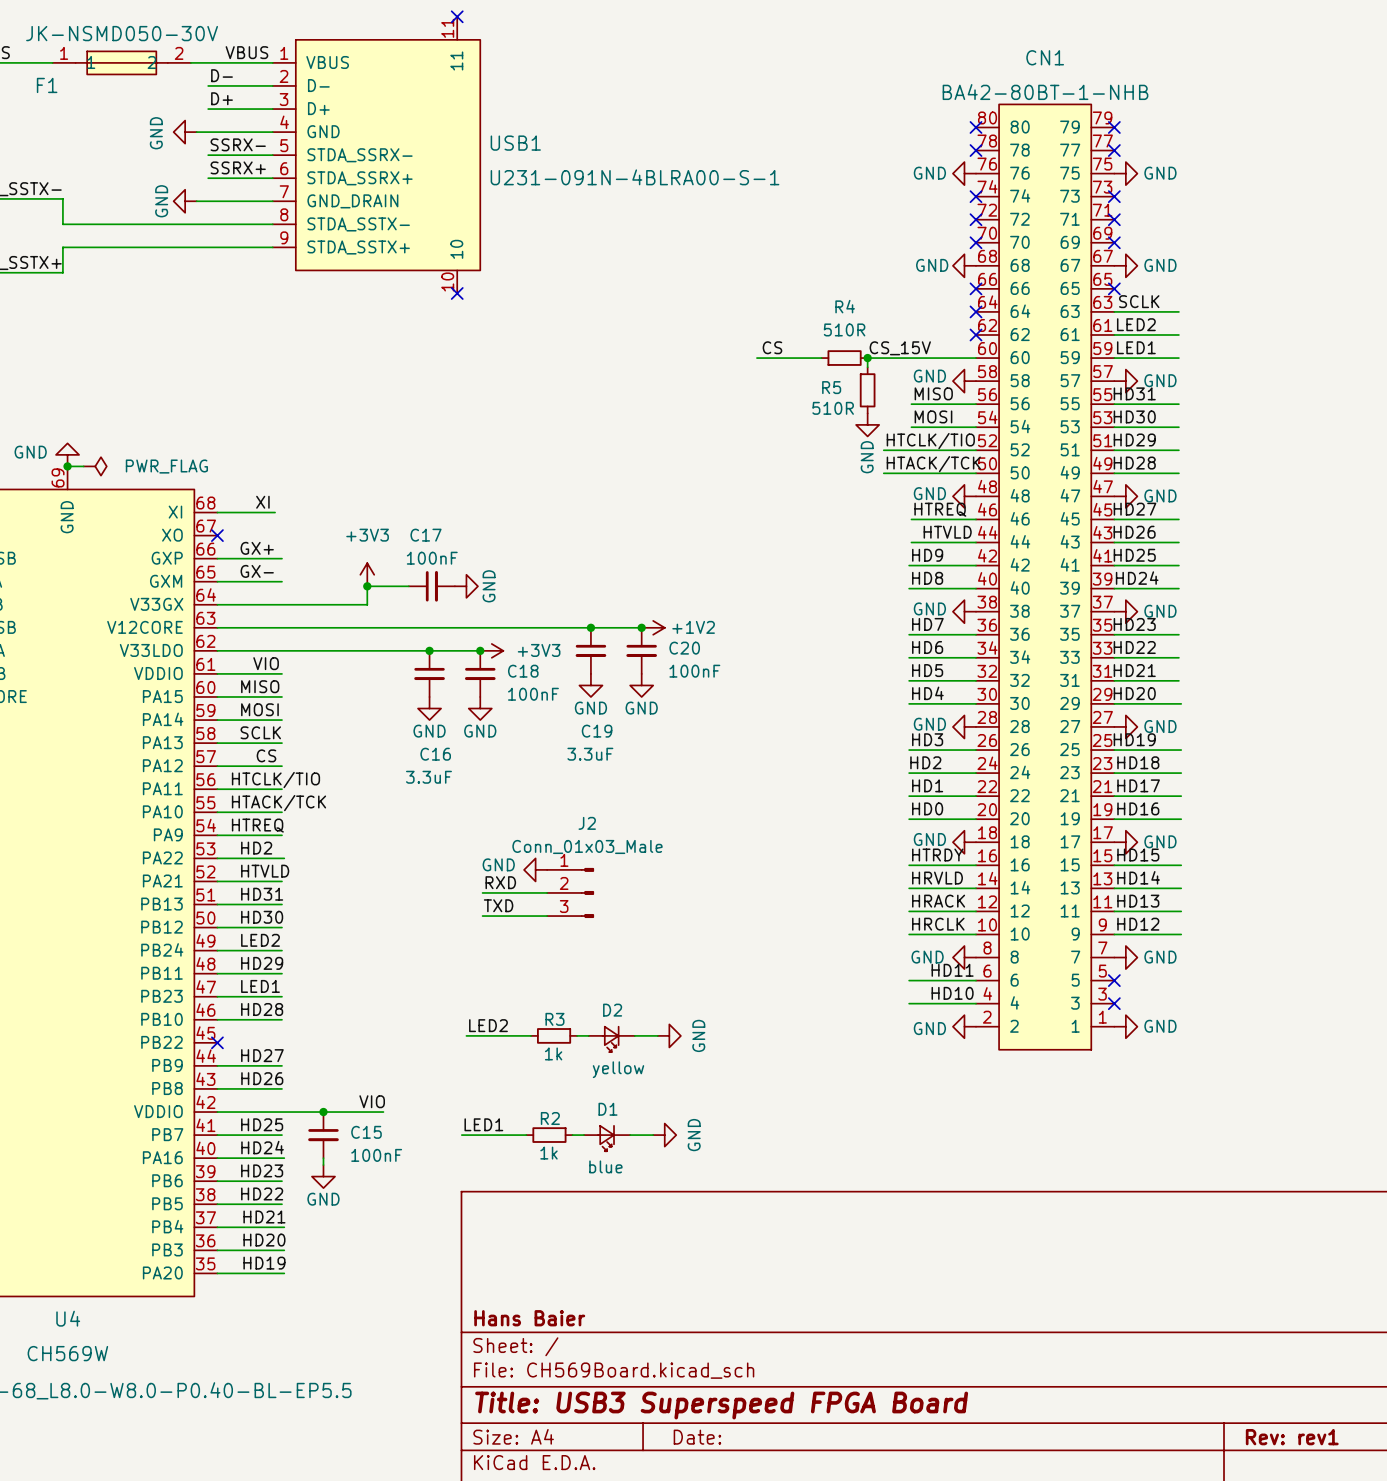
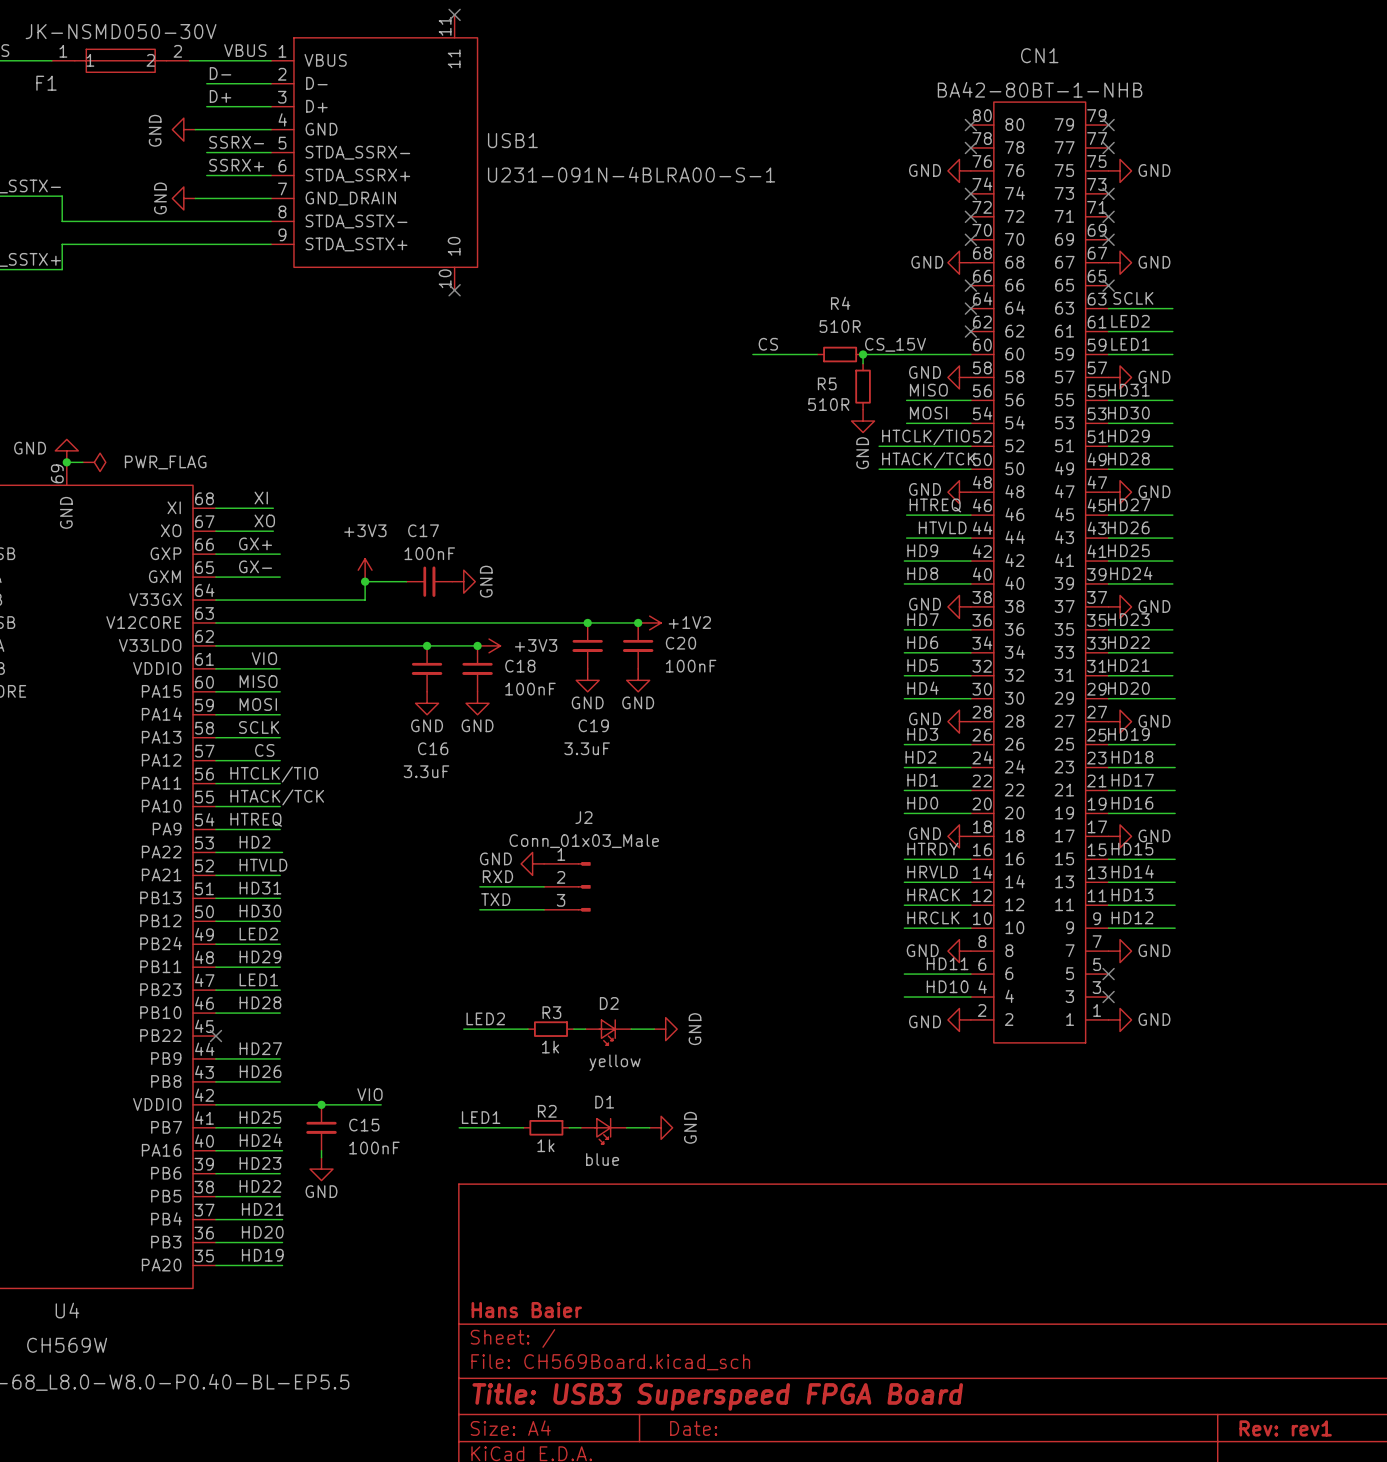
label: none -> XO (264, 520)
wire: none -> (215, 531) (273, 531)
no-connect mark: (217, 535) -> none

